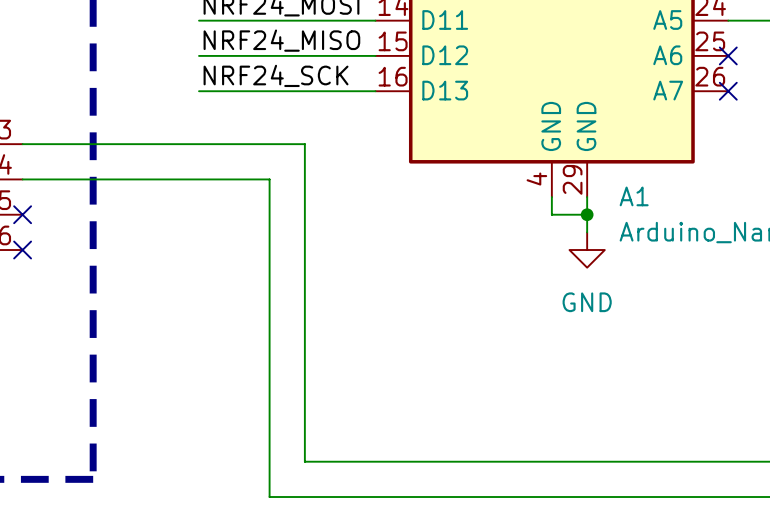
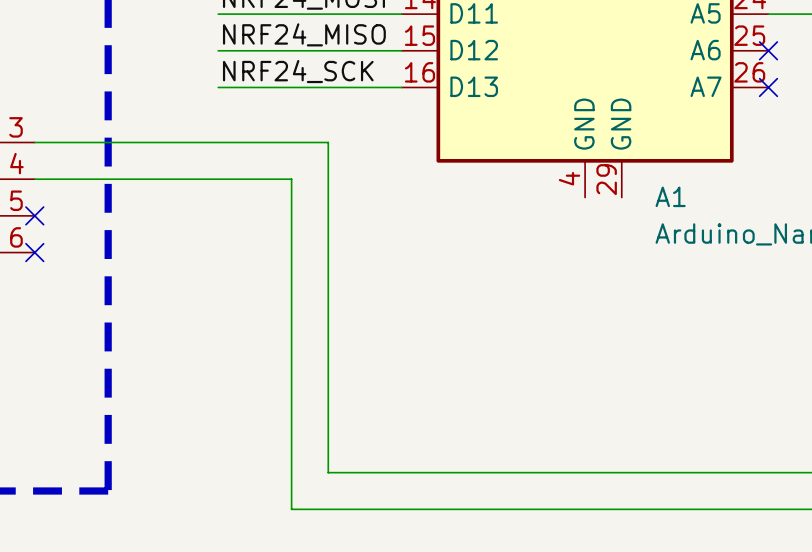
wire: (551, 197) (551, 214) (587, 214) -> none
wire: (587, 197) (587, 232) -> none
junction: (587, 214) -> none
power symbol: GND (587, 250) -> none

